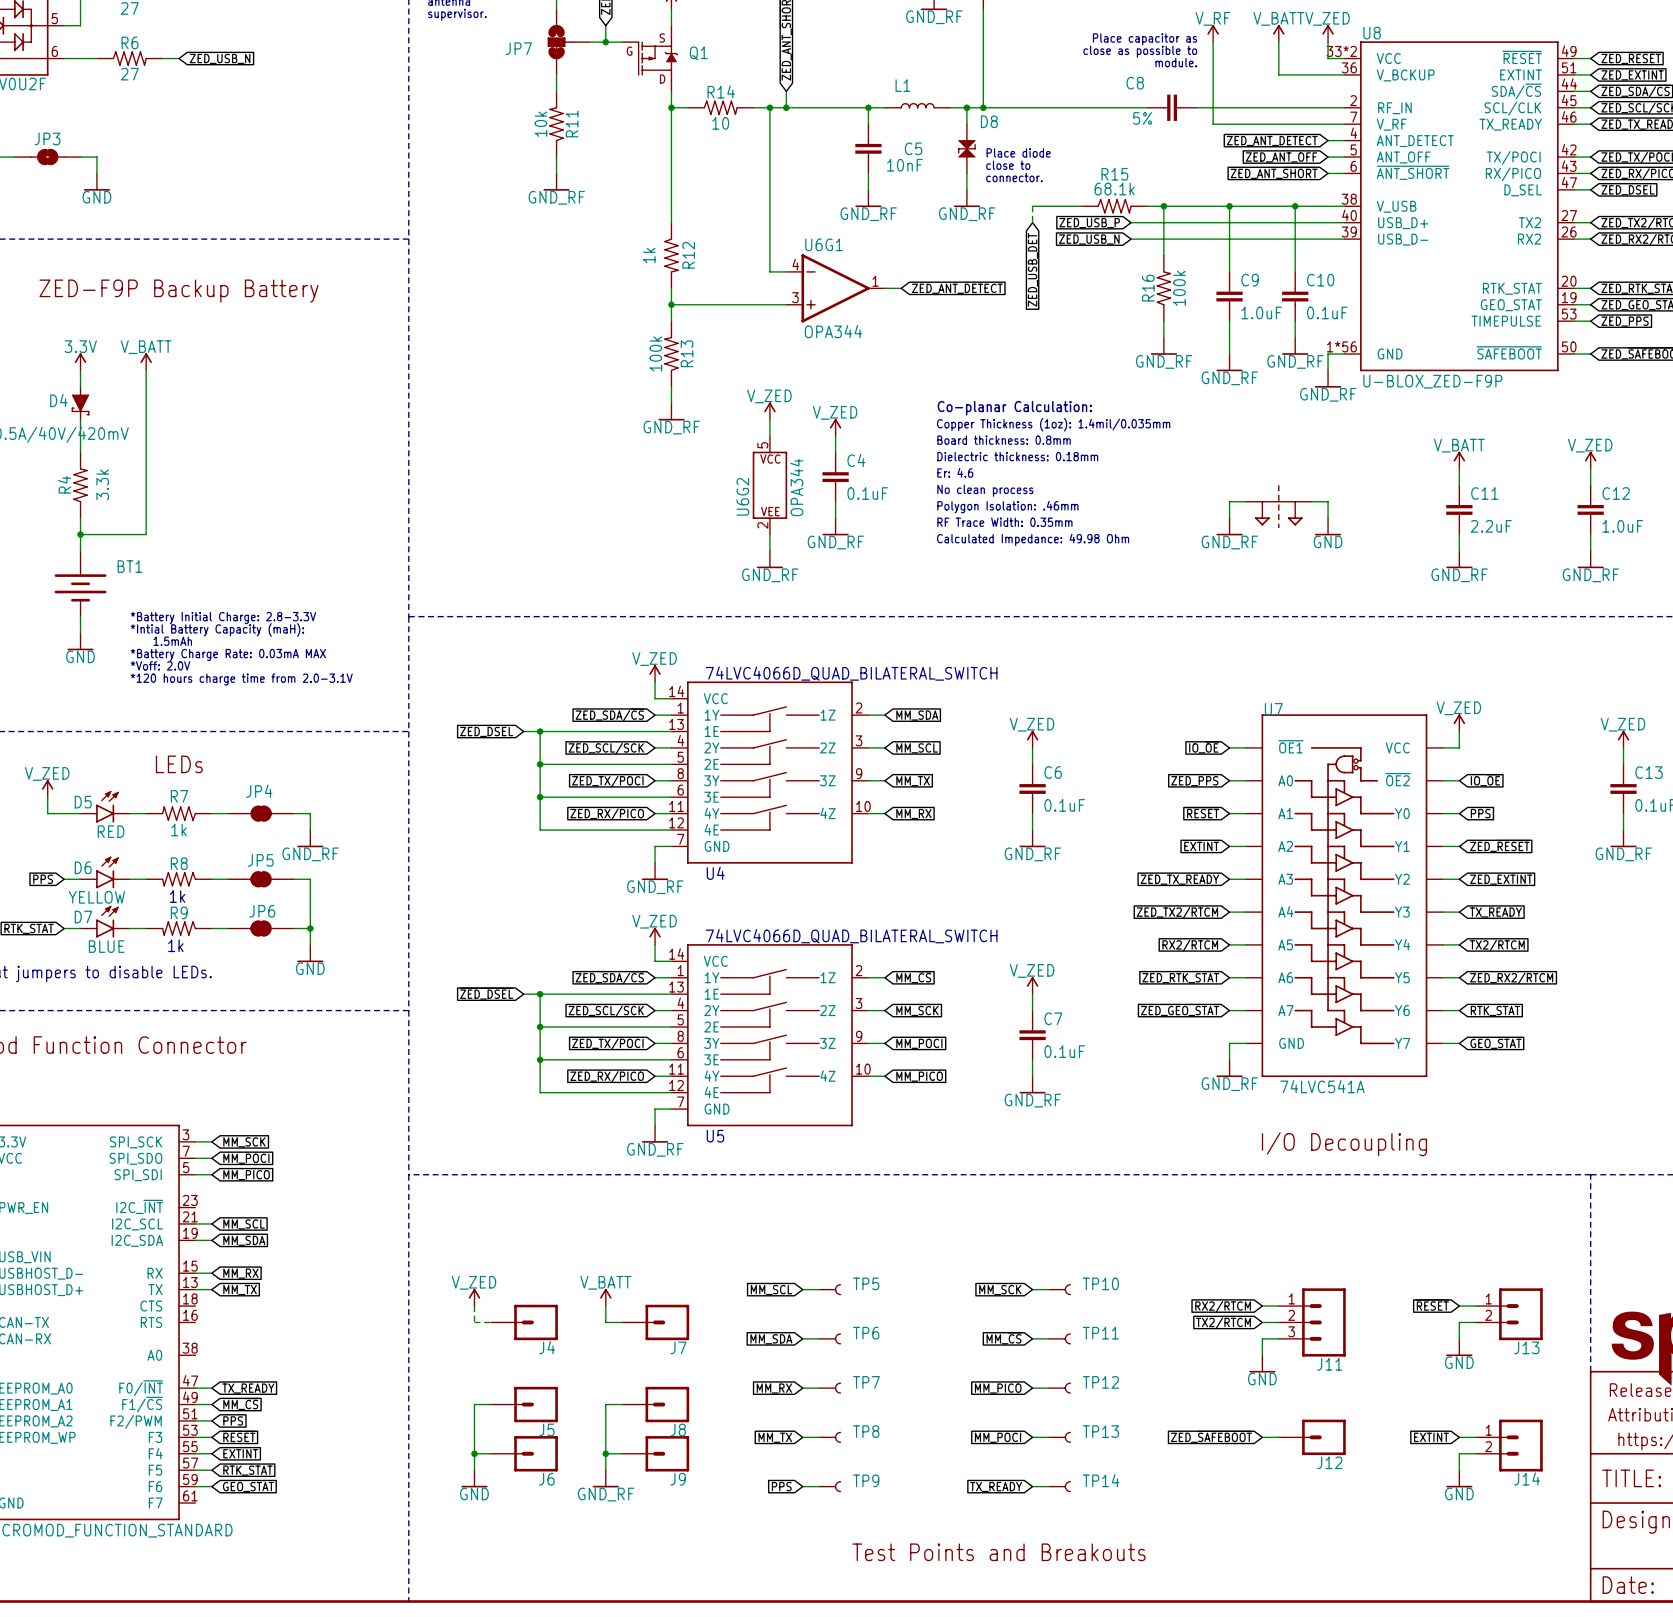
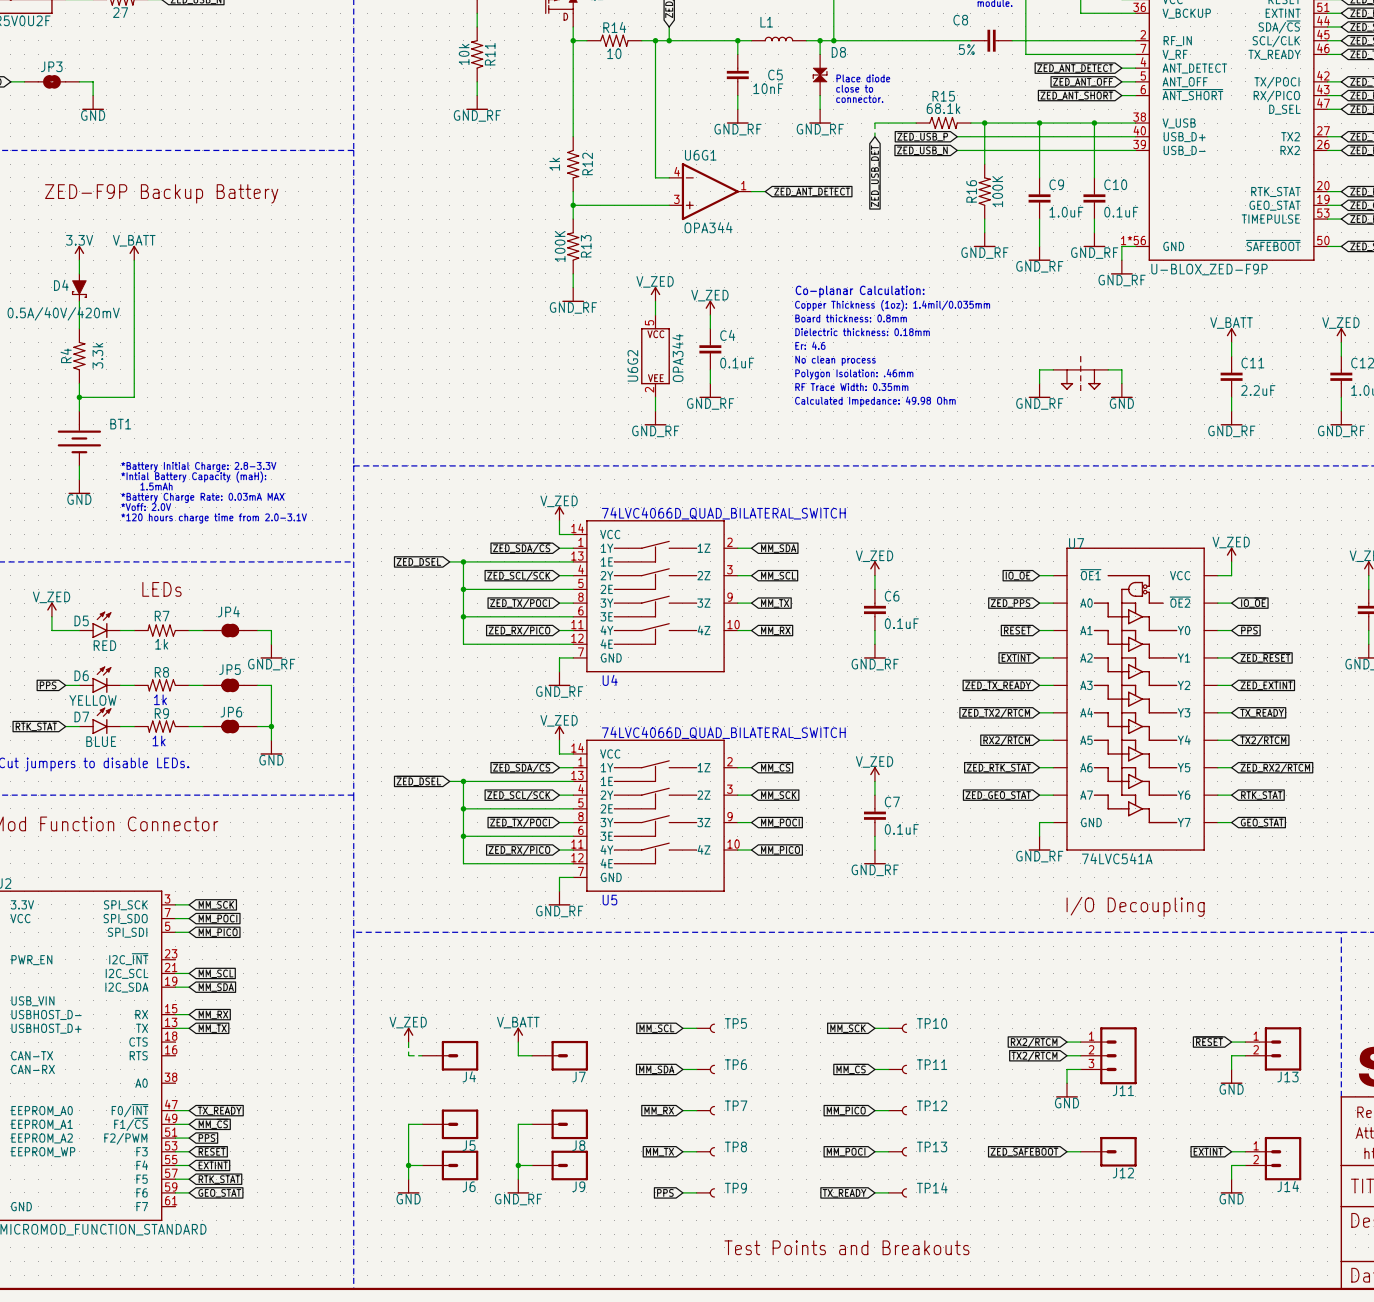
R16 value: 100k (1179, 288) -> 100K (997, 191)
R13 value: 100k (655, 354) -> 100K (560, 246)

